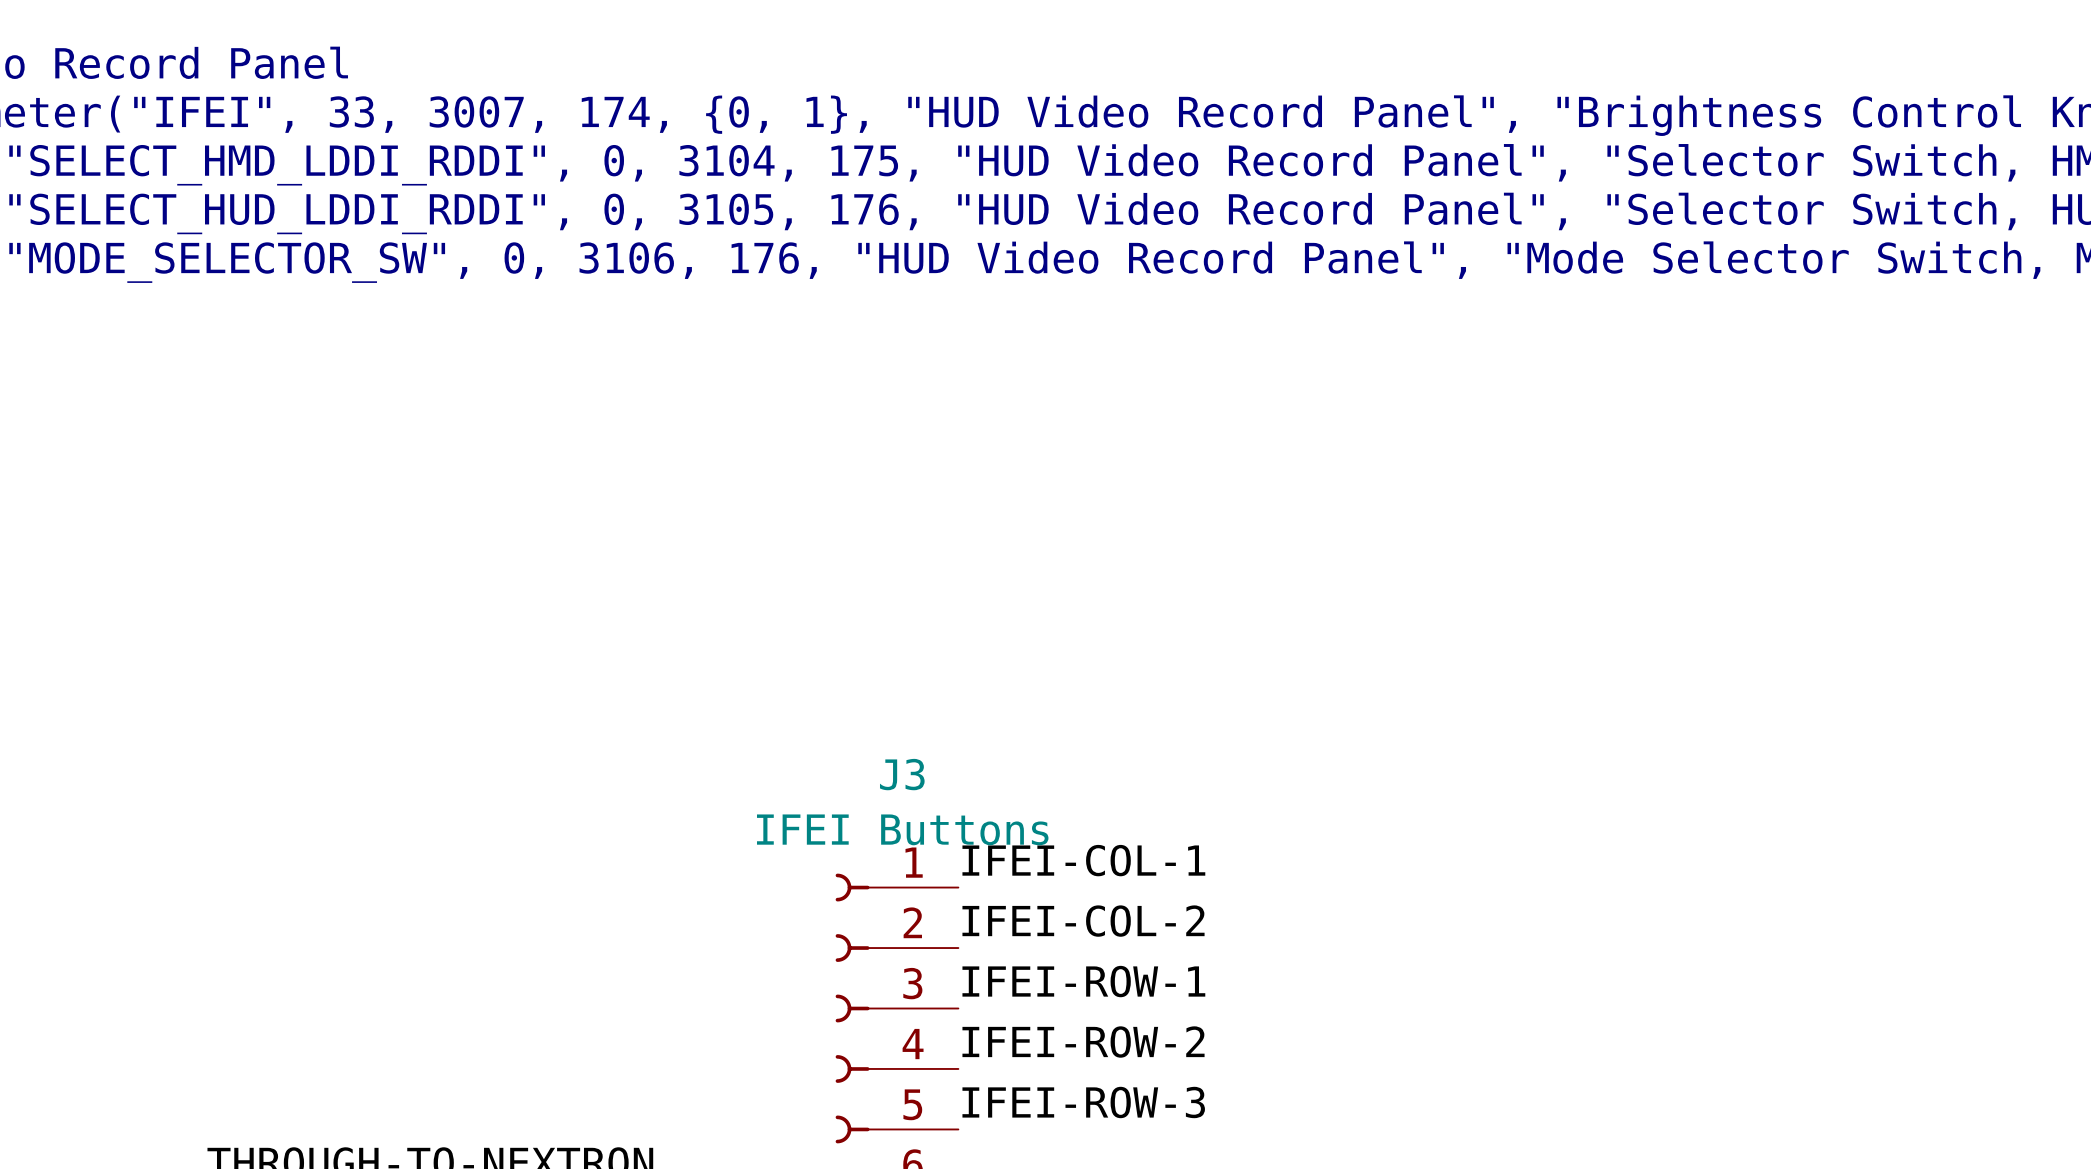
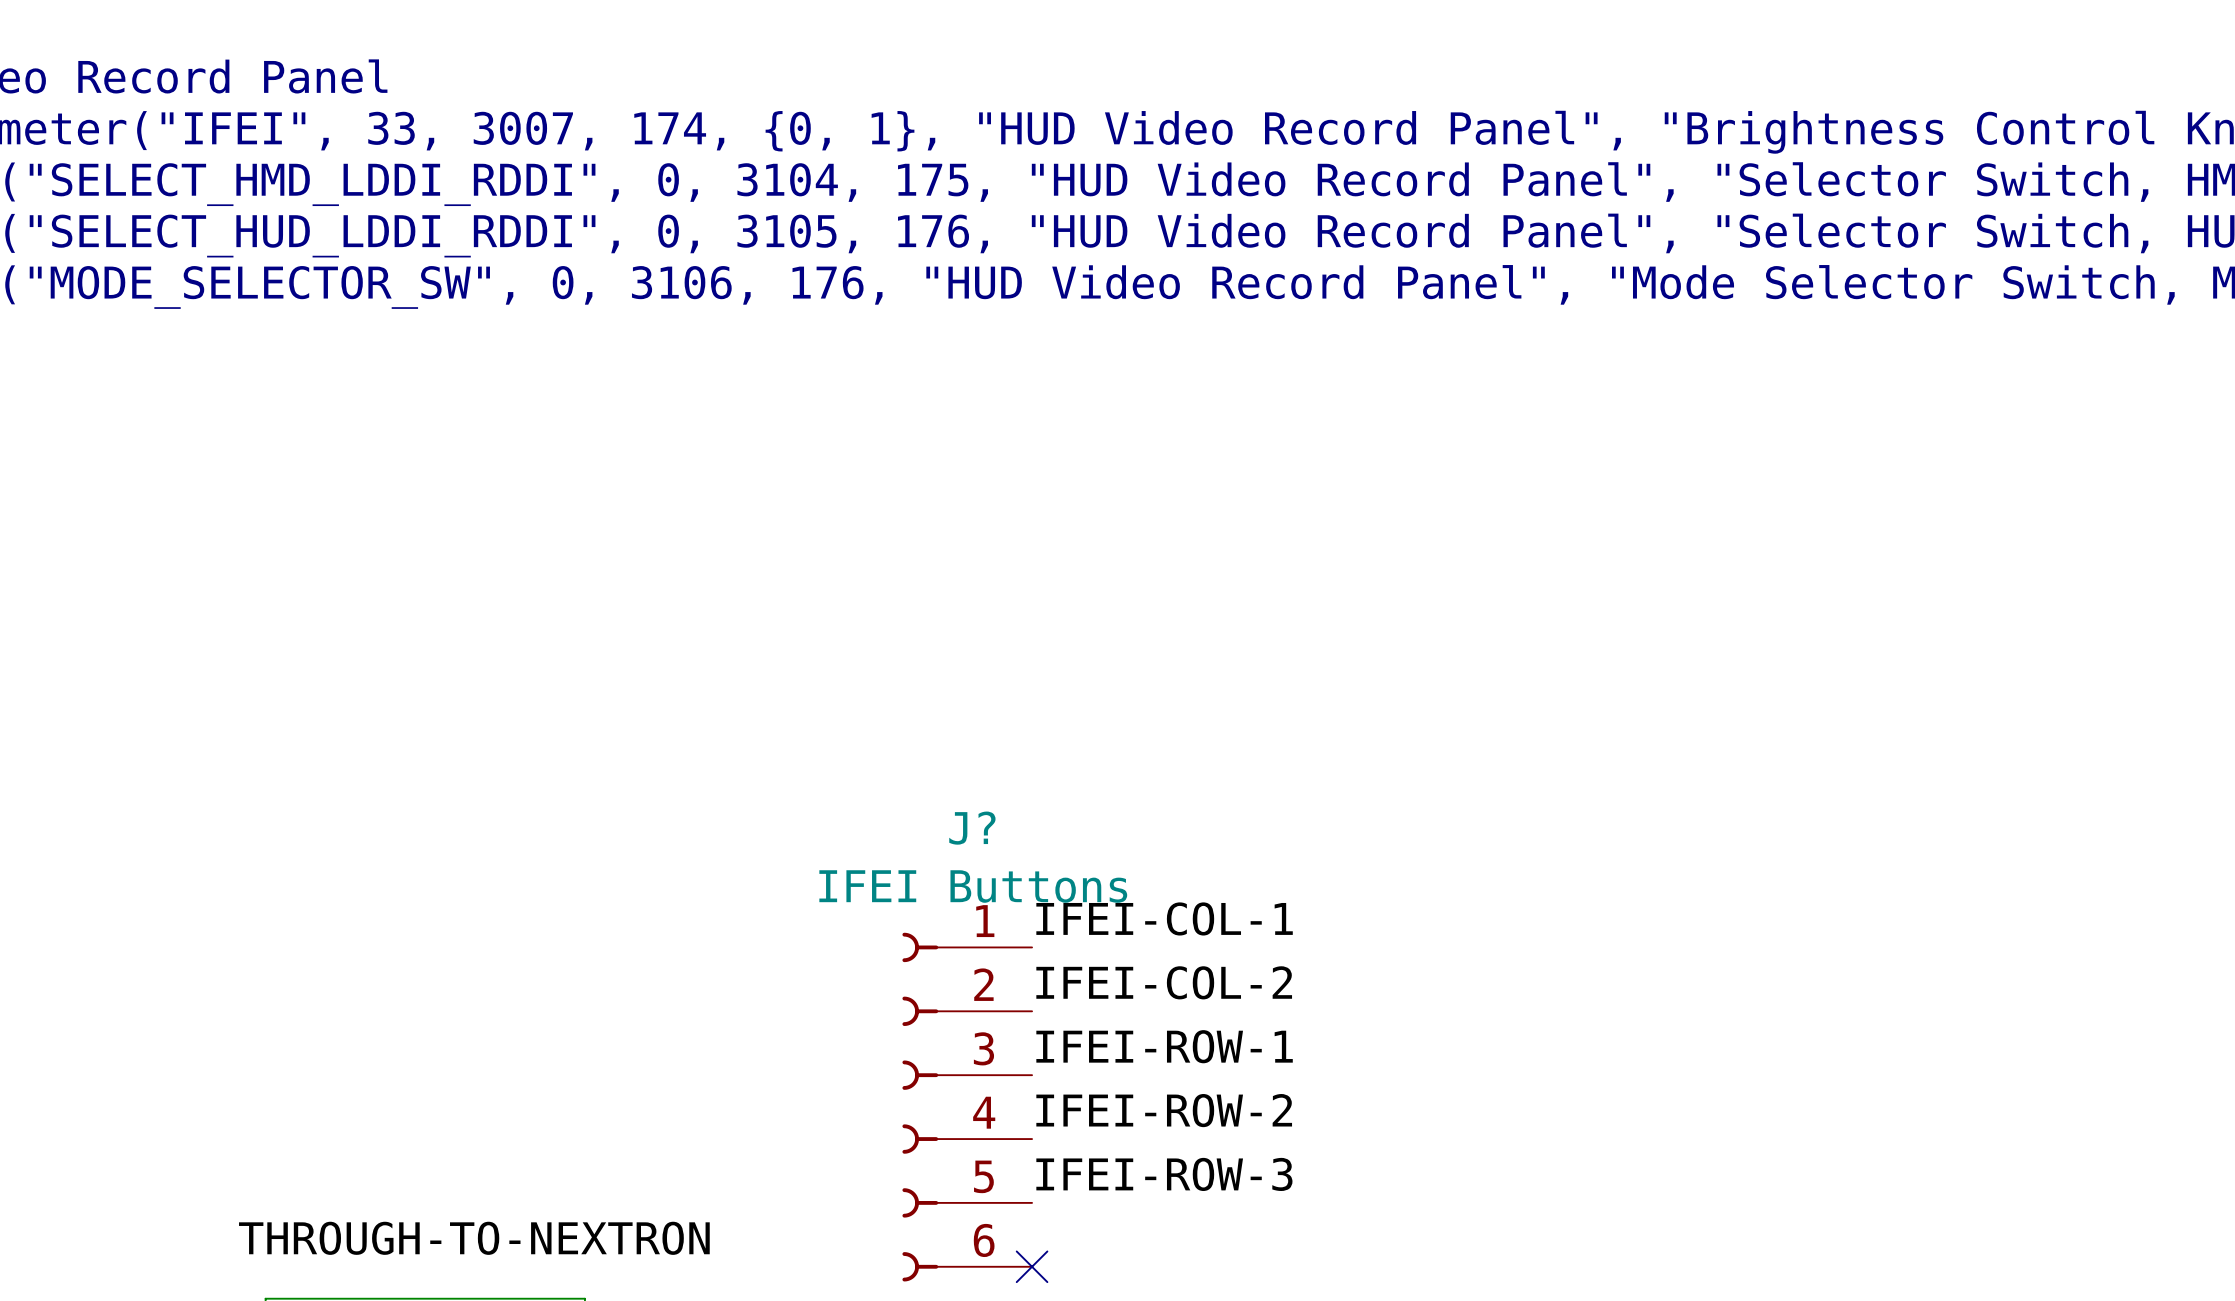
J3 name: J3 (902, 774) -> J? (972, 828)

